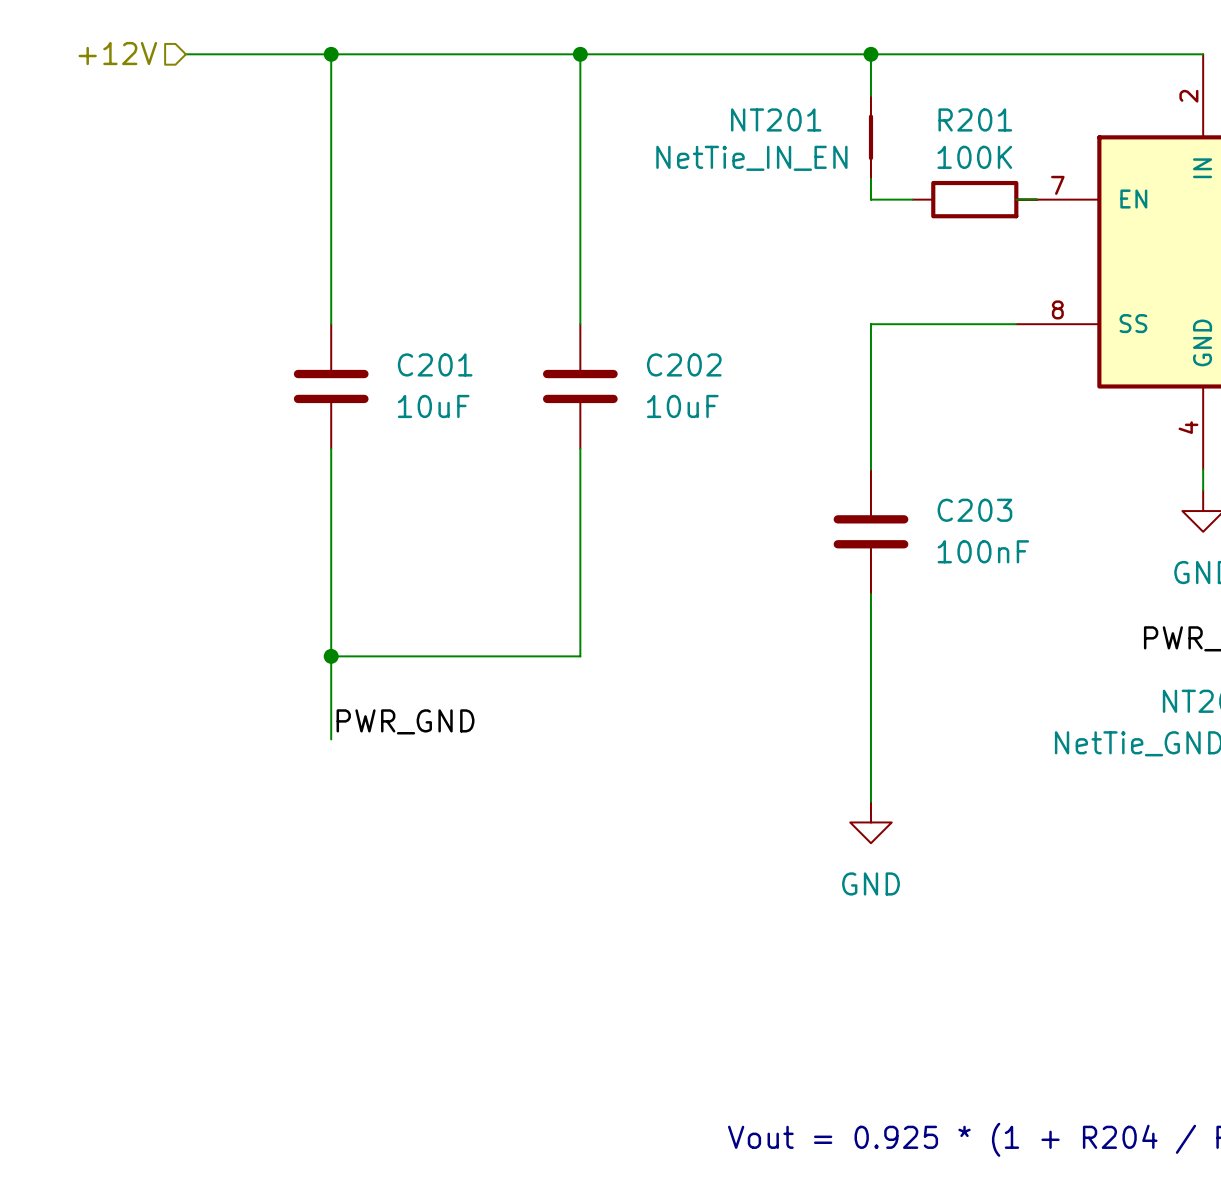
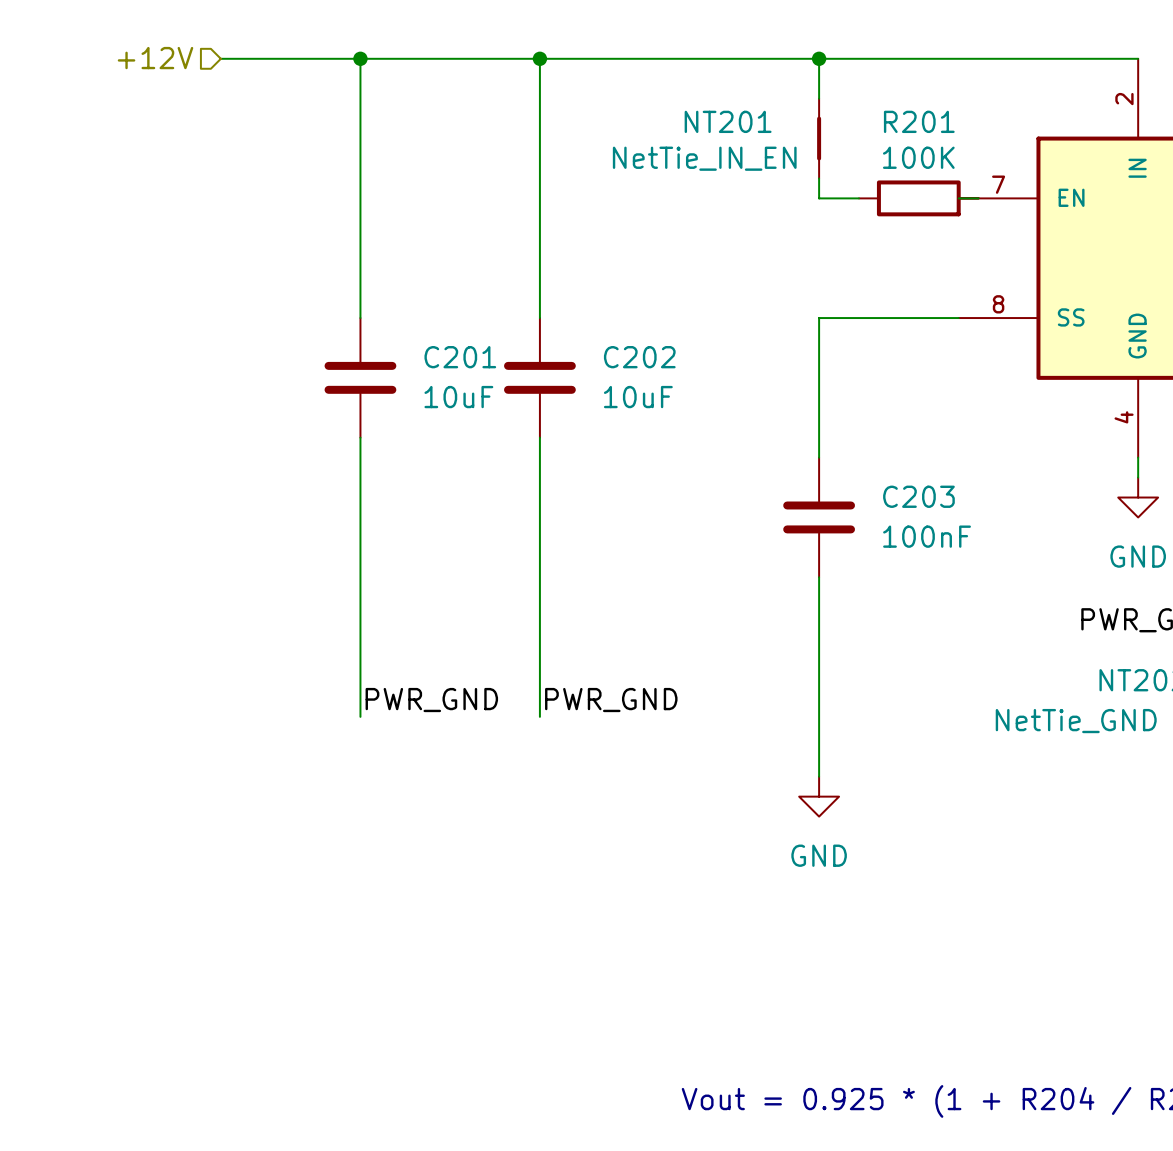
hierarchical label position: +12V (117, 53) -> +12V (155, 58)
wire: (185, 54) (248, 54) -> none
wire: (331, 54) (331, 324) -> (360, 58) (360, 318)
junction position: (331, 54) -> (360, 58)
C201 position: (331, 386) -> (360, 377)
wire: (331, 448) (331, 739) -> (360, 437) (360, 716)
wire: (331, 656) (580, 656) -> (539, 716) (539, 637)
junction: (331, 656) -> none
label position: PWR_GND (405, 721) -> PWR_GND (431, 700)
label: none -> PWR_GND (611, 700)

